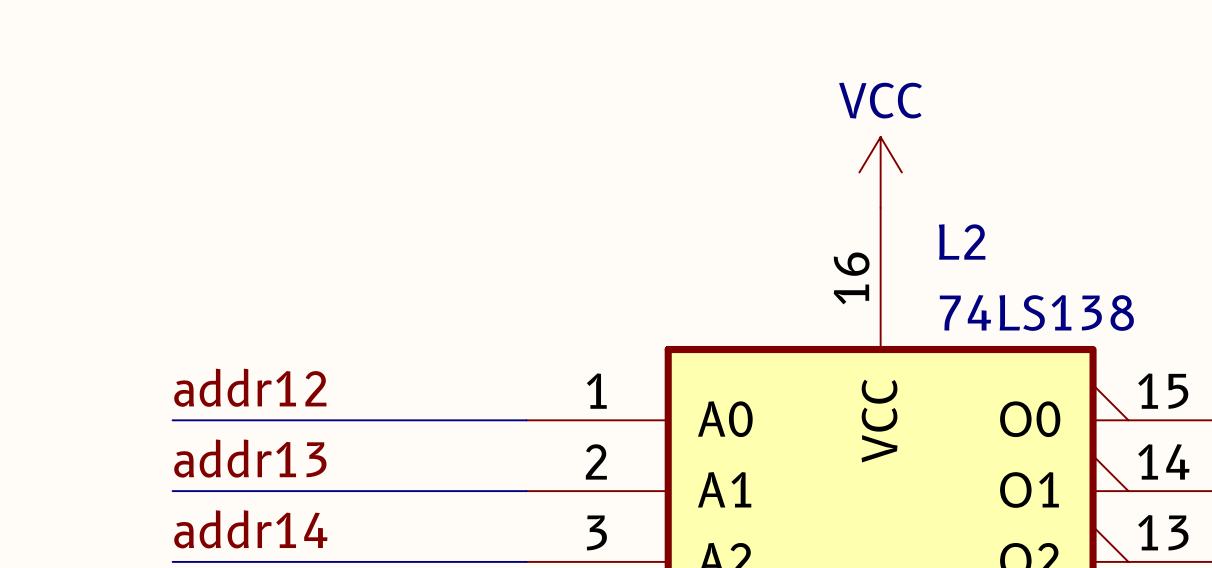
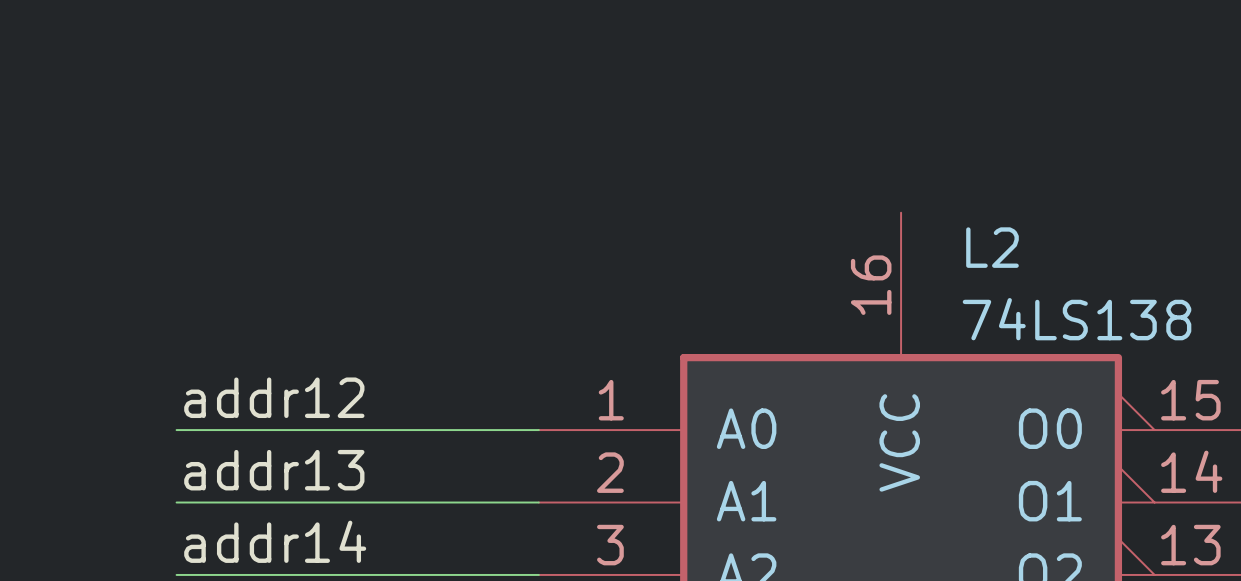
power symbol: VCC (880, 172) -> none

